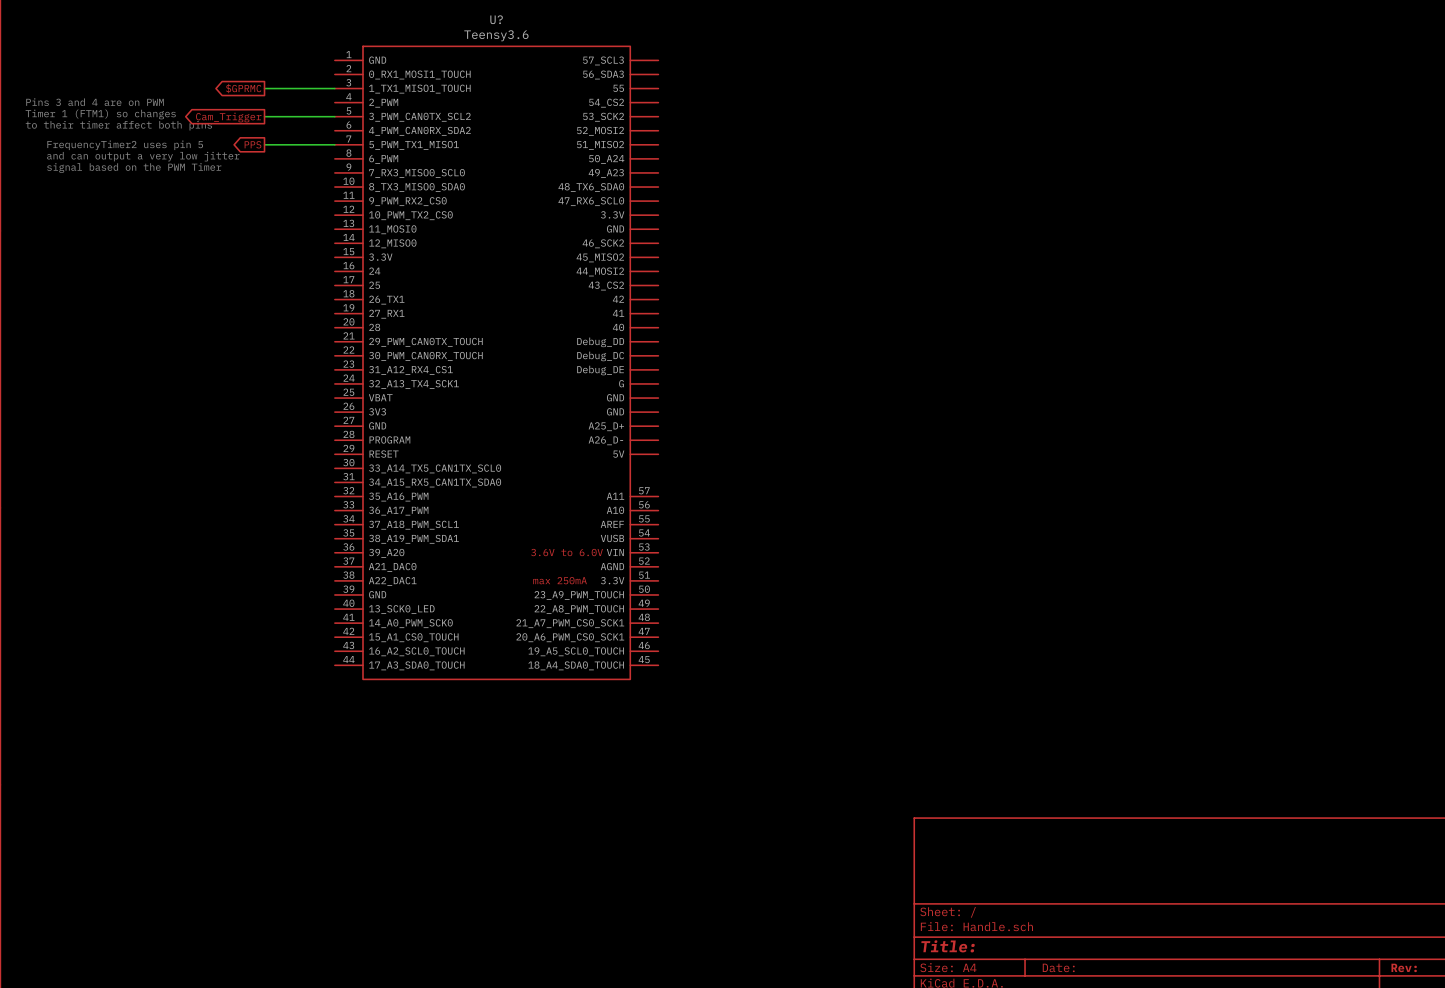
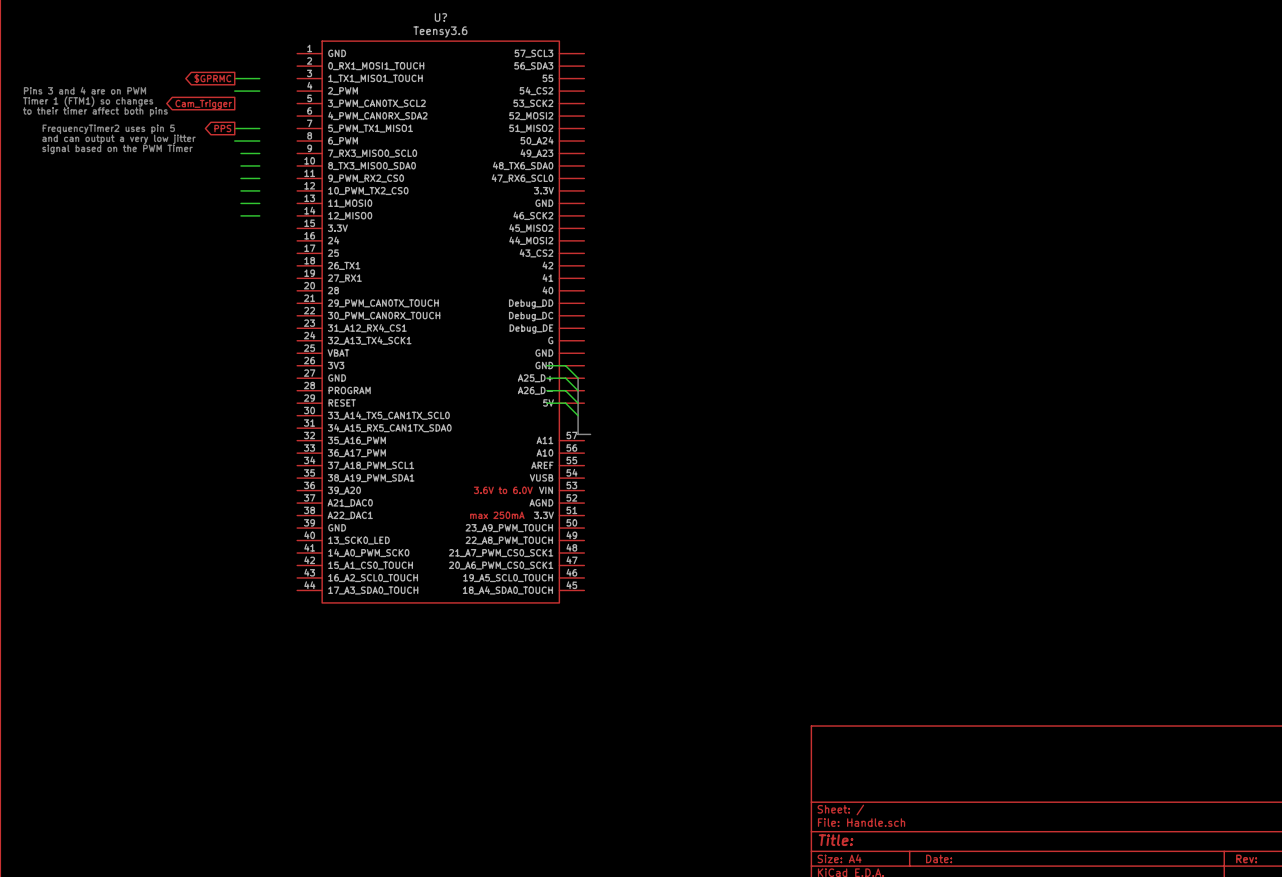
wire: (292, 88) (334, 88) -> none
wire: none -> (234, 91) (259, 91)
wire: (264, 116) (334, 116) -> none
wire: (292, 144) (334, 144) -> none
wire: none -> (234, 141) (259, 141)
wire: none -> (241, 153) (259, 153)
wire: none -> (241, 165) (259, 165)
wire: none -> (241, 178) (259, 178)
wire: none -> (241, 190) (259, 190)
wire: none -> (241, 203) (259, 203)
wire: none -> (241, 215) (259, 215)
wire: none -> (546, 365) (565, 365) (578, 378)
wire: none -> (546, 378) (565, 378) (578, 390)
bus: none -> (578, 378) (578, 434) (590, 434)
wire: none -> (546, 390) (565, 390) (578, 403)
wire: none -> (546, 403) (565, 403) (578, 415)

